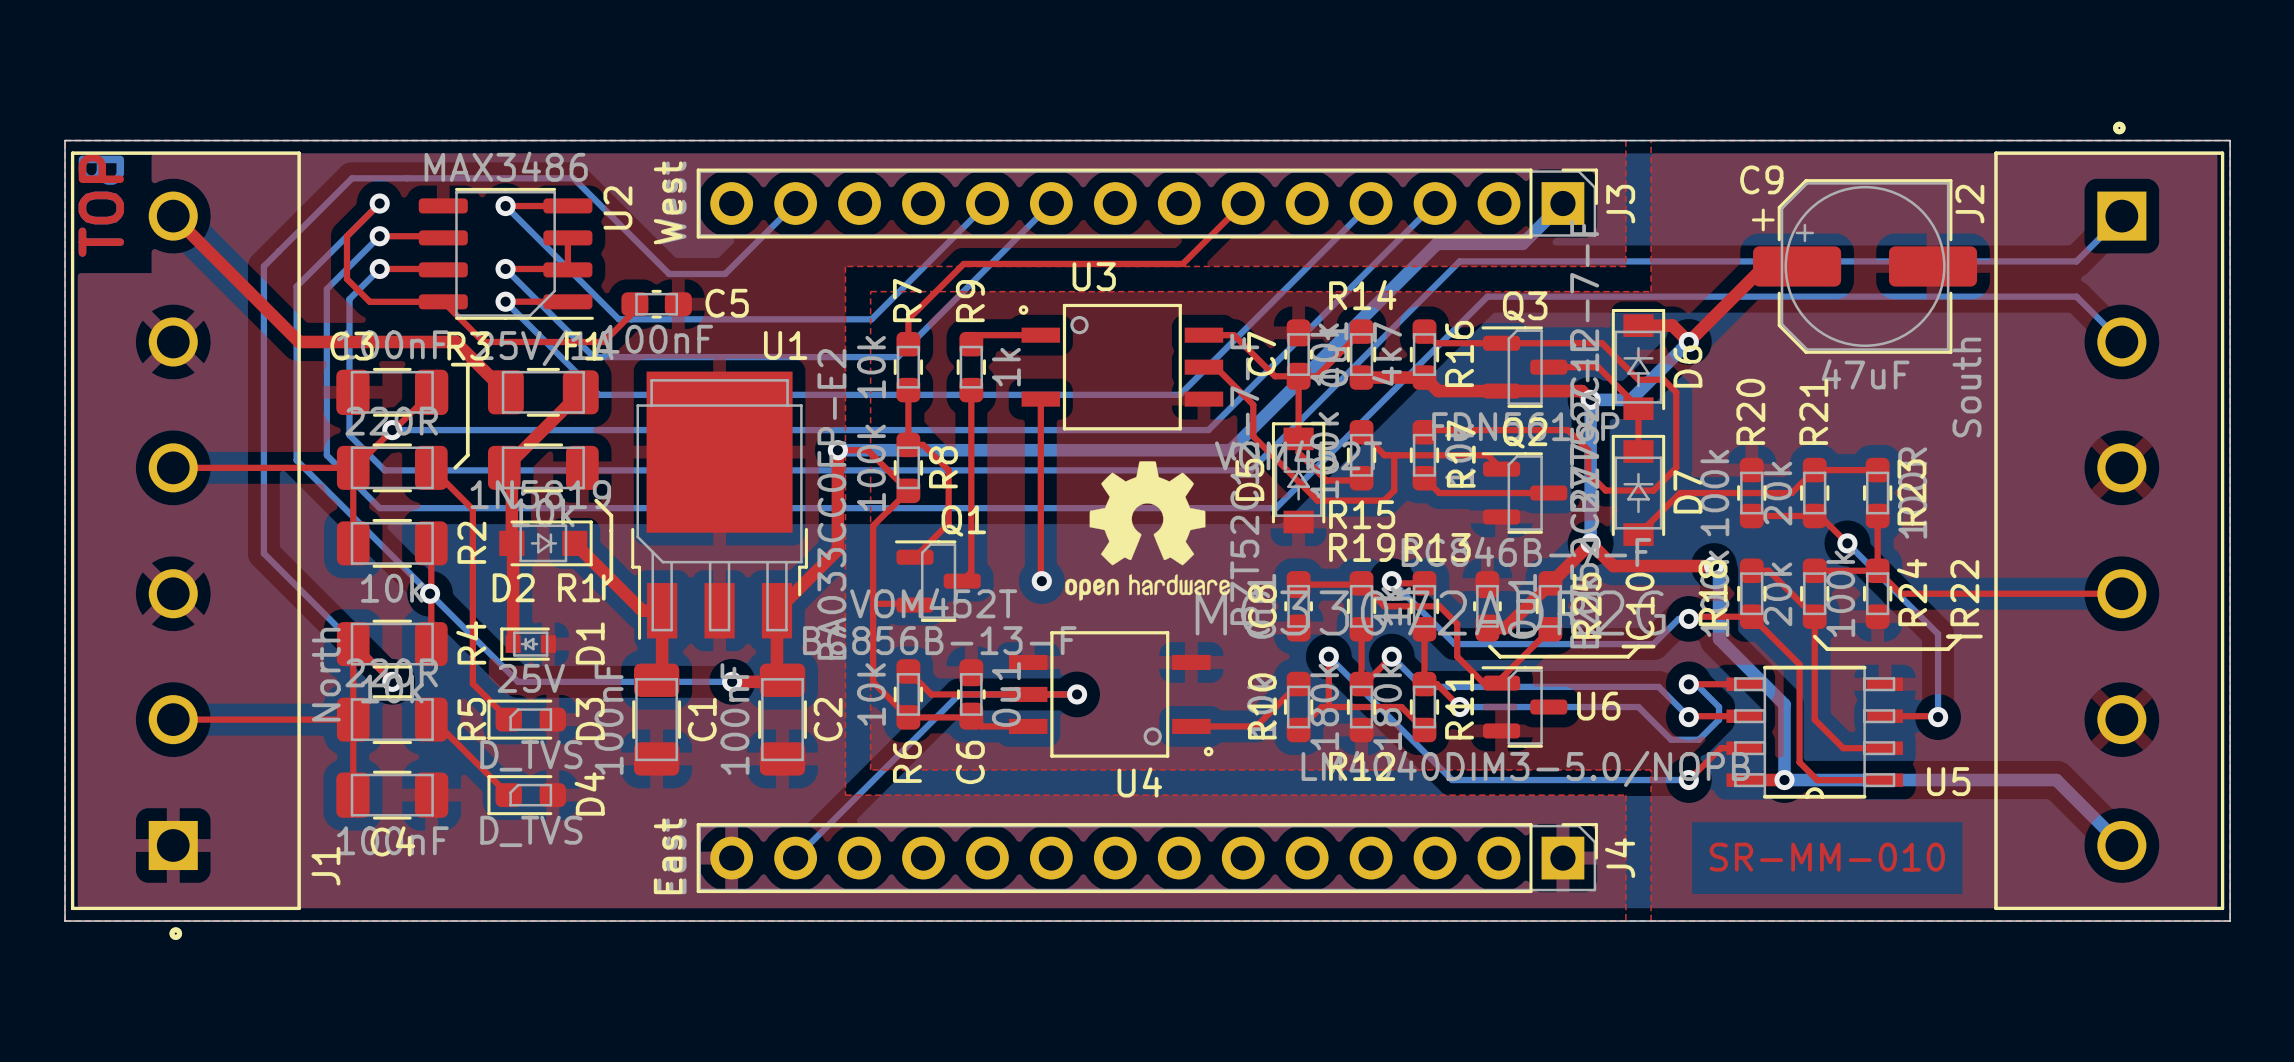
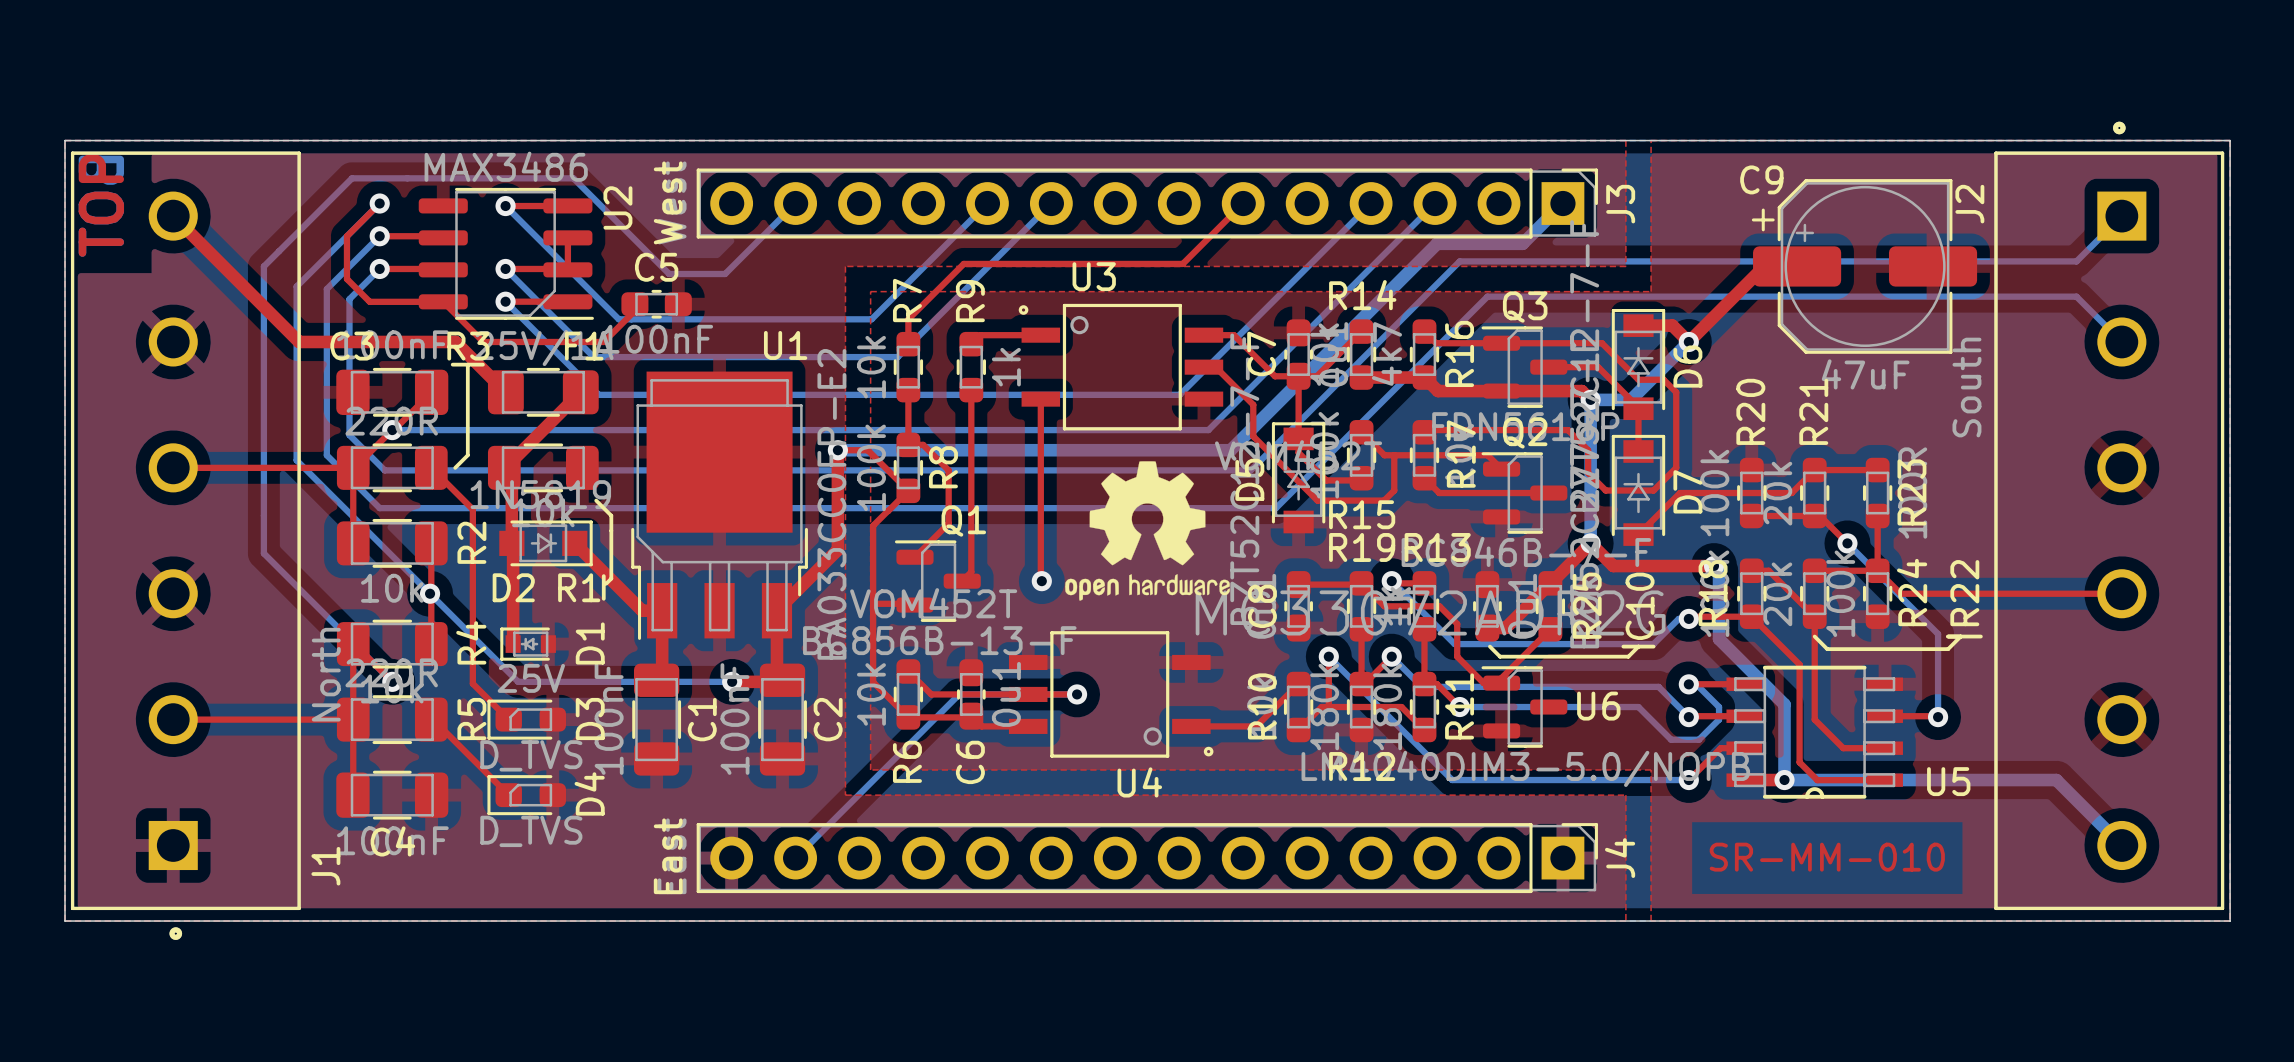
C5 name position: C5 (727, 303) -> C5 (656, 267)

